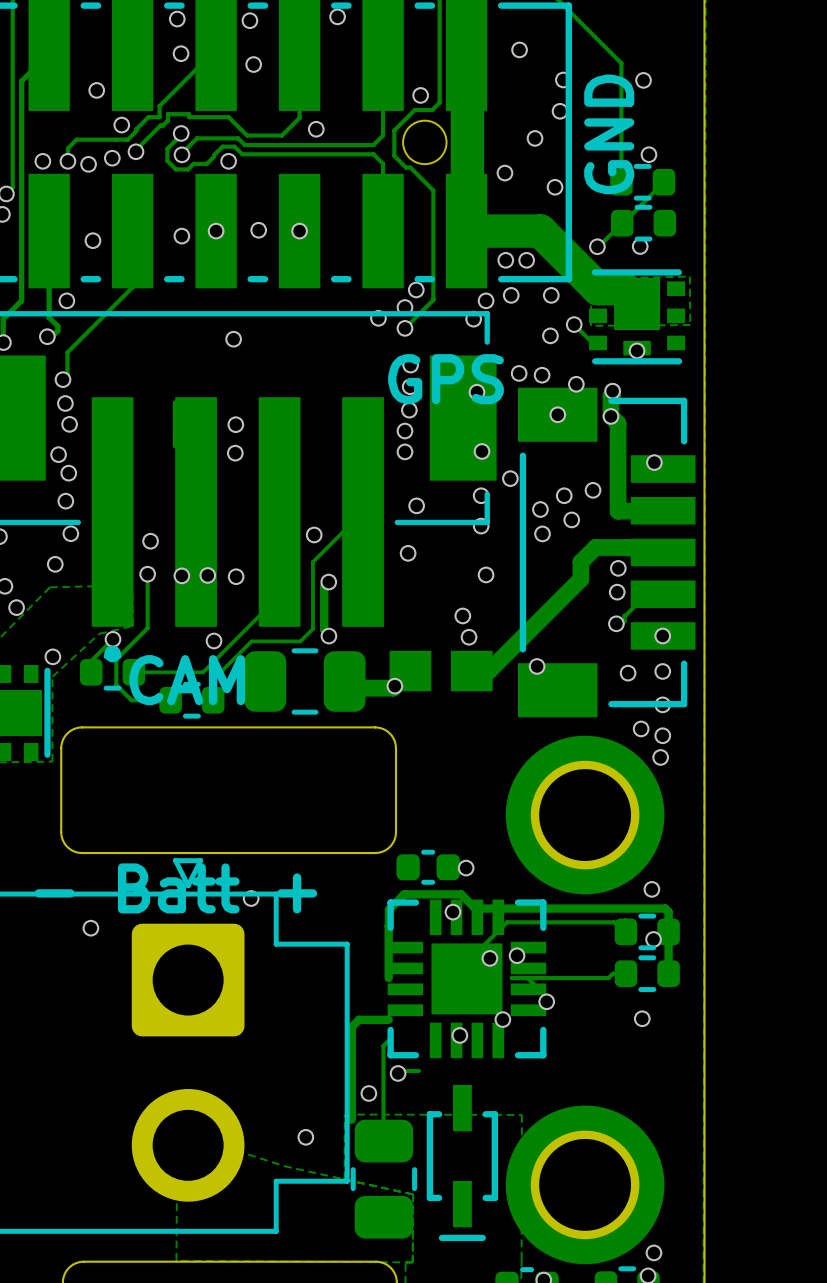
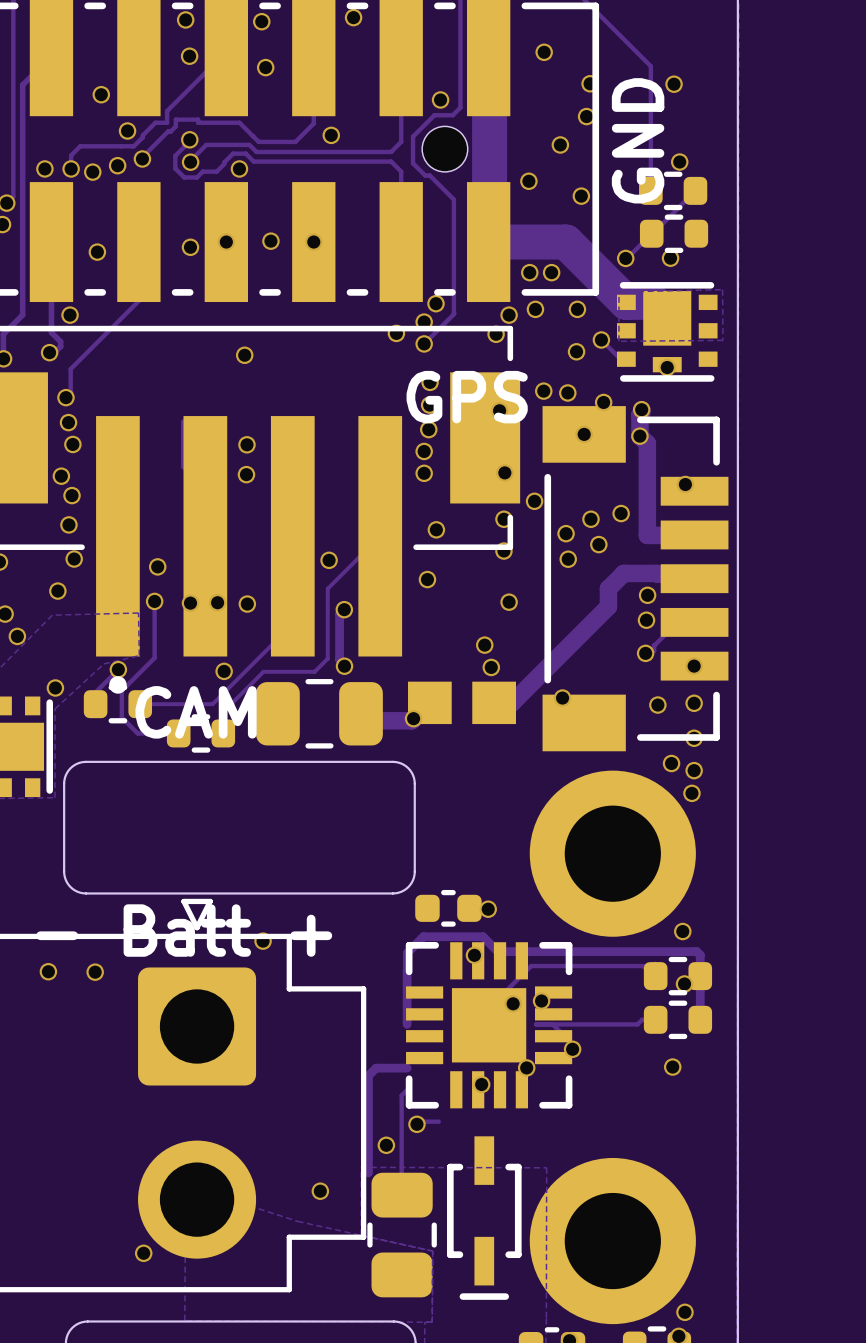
via: none -> (48, 971)
via: none -> (143, 1253)

